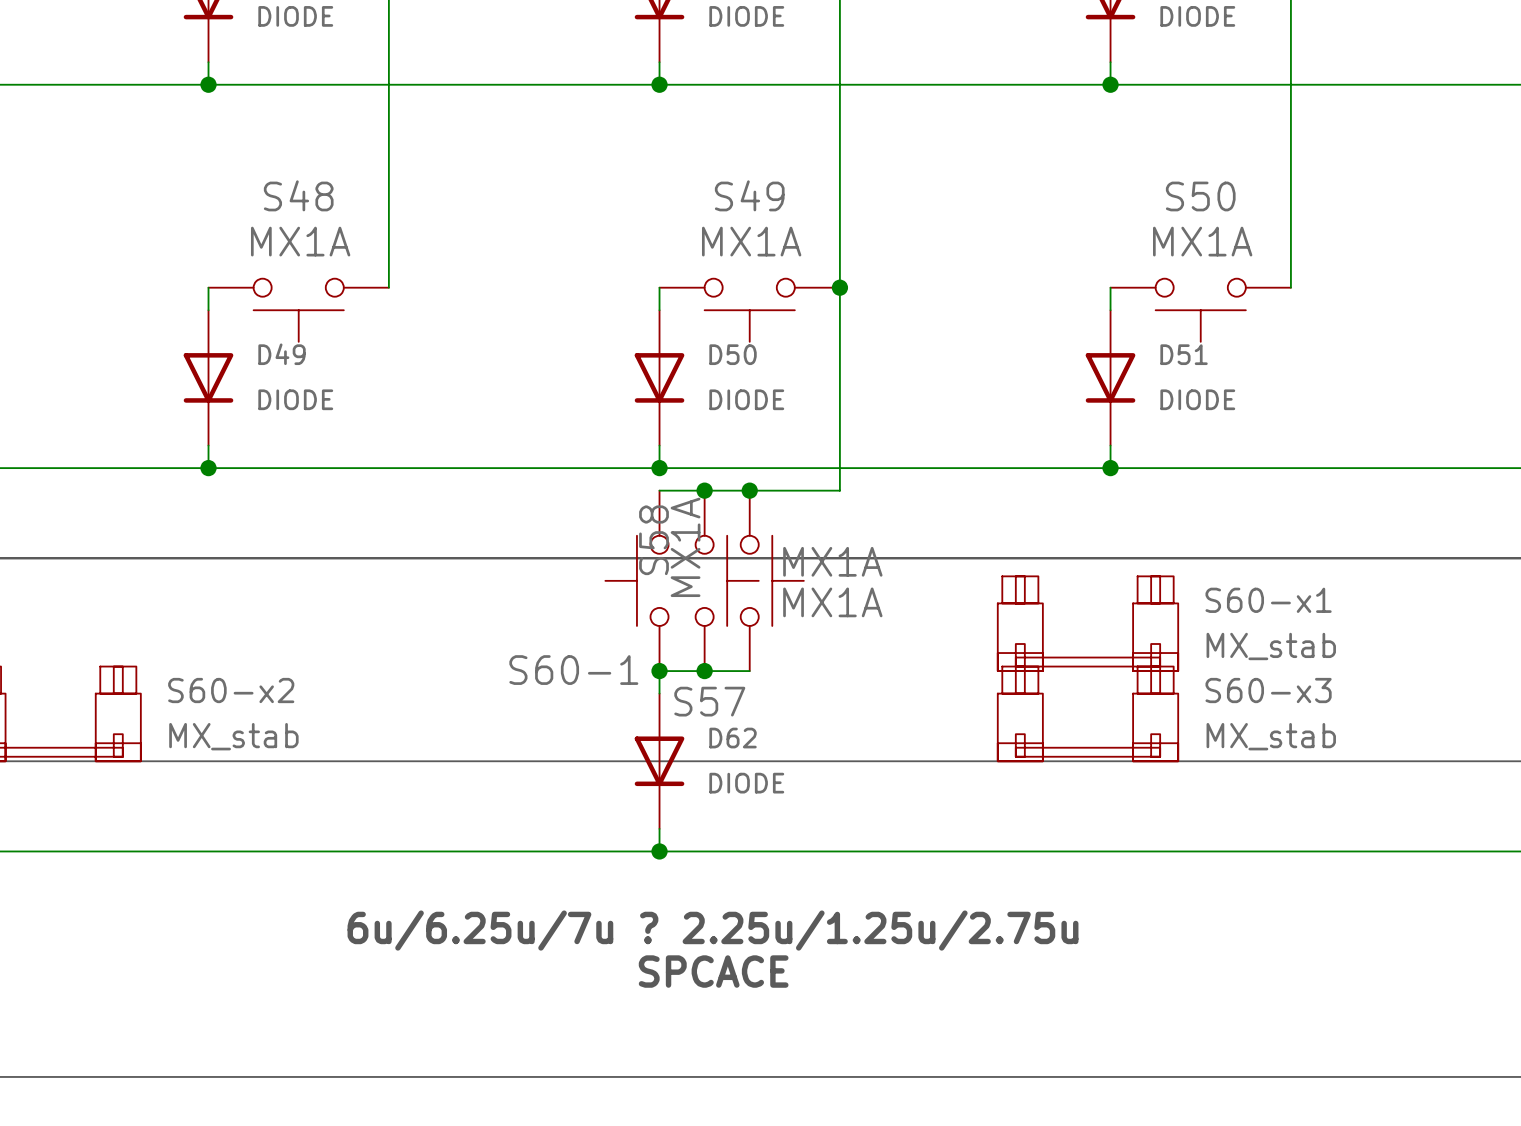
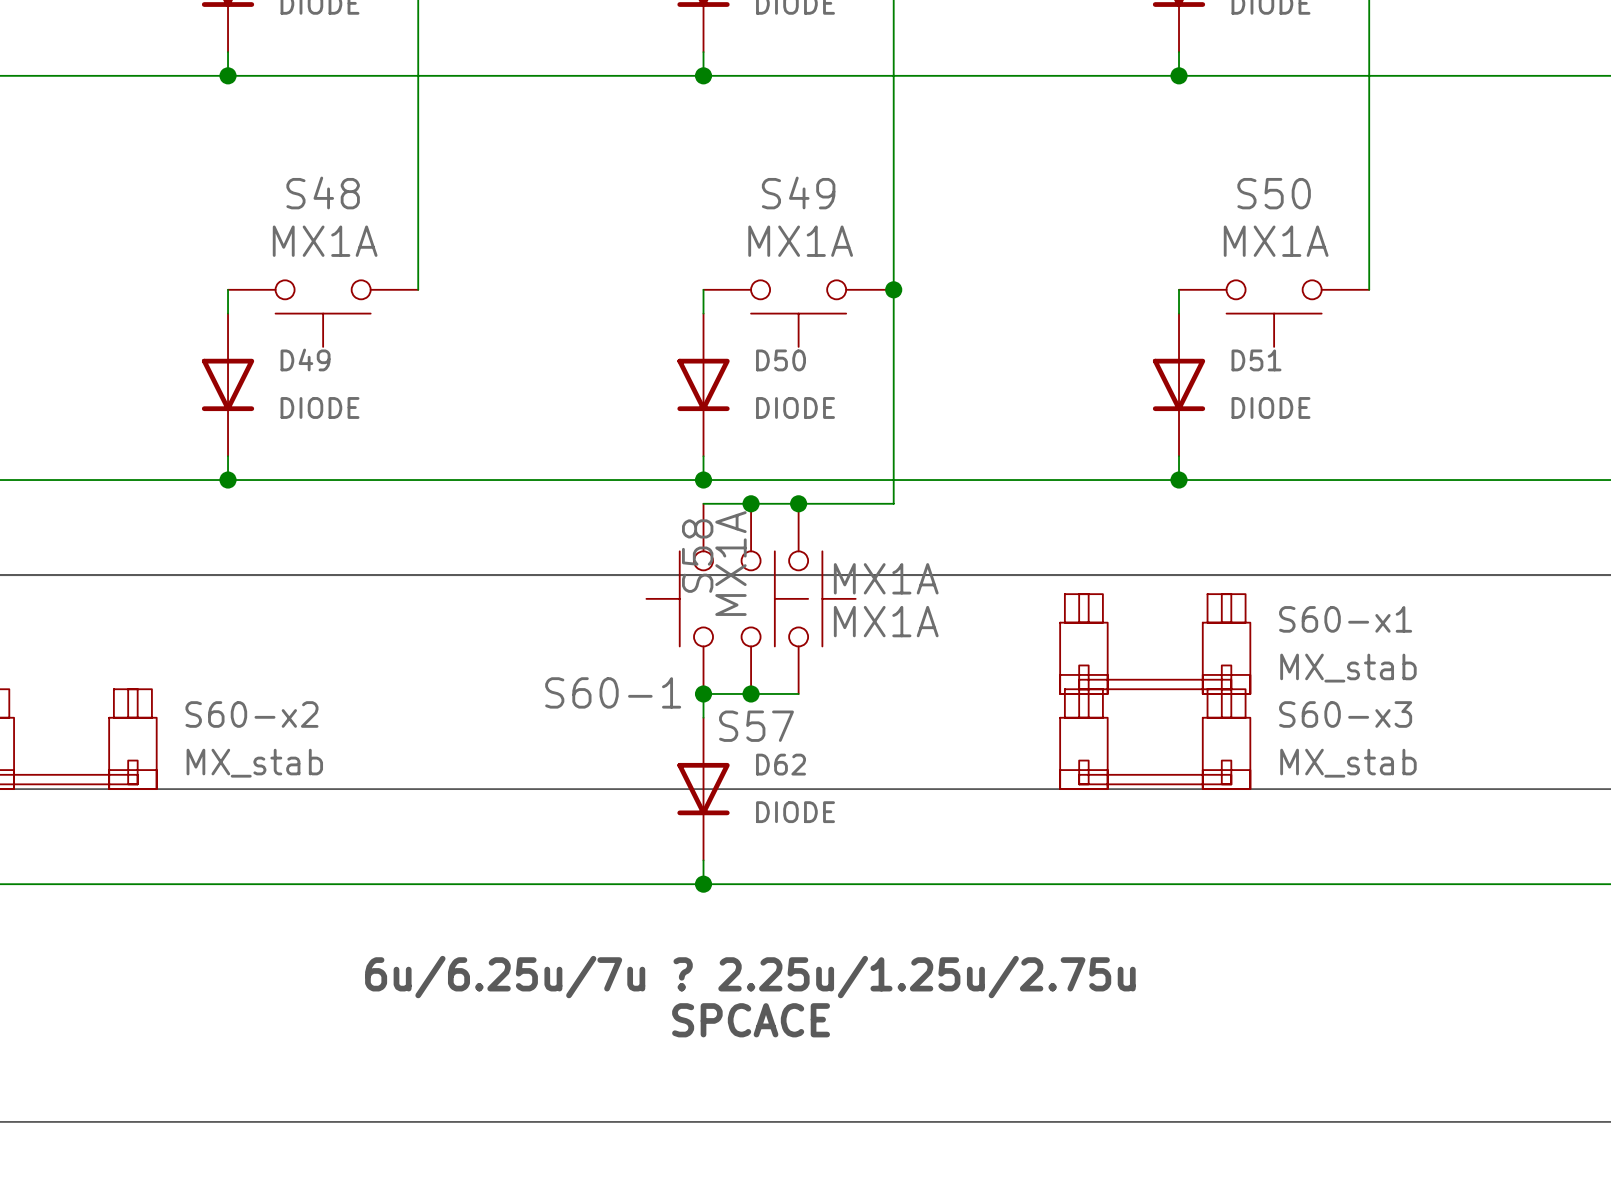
text position: 6u/6.25u/7u ? 2.25u/1.25u/2.75u (713, 930) -> 6u/6.25u/7u ? 2.25u/1.25u/2.75u (750, 977)
text position: SPCACE (713, 971) -> SPCACE (751, 1020)

